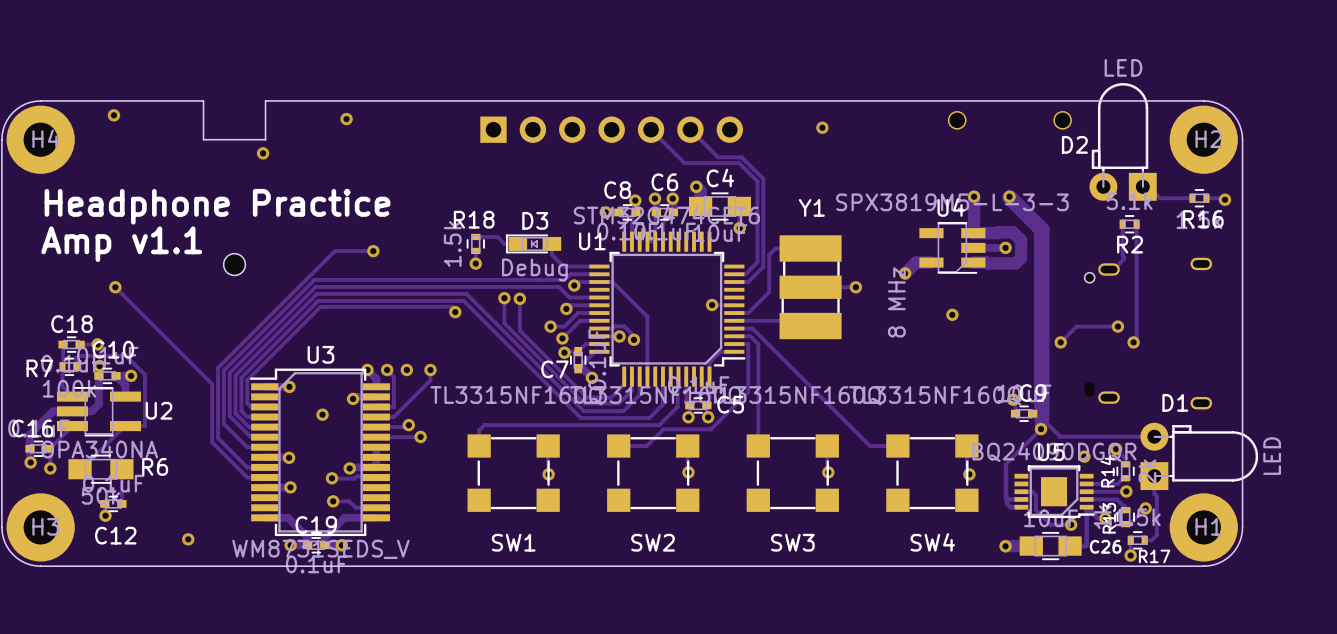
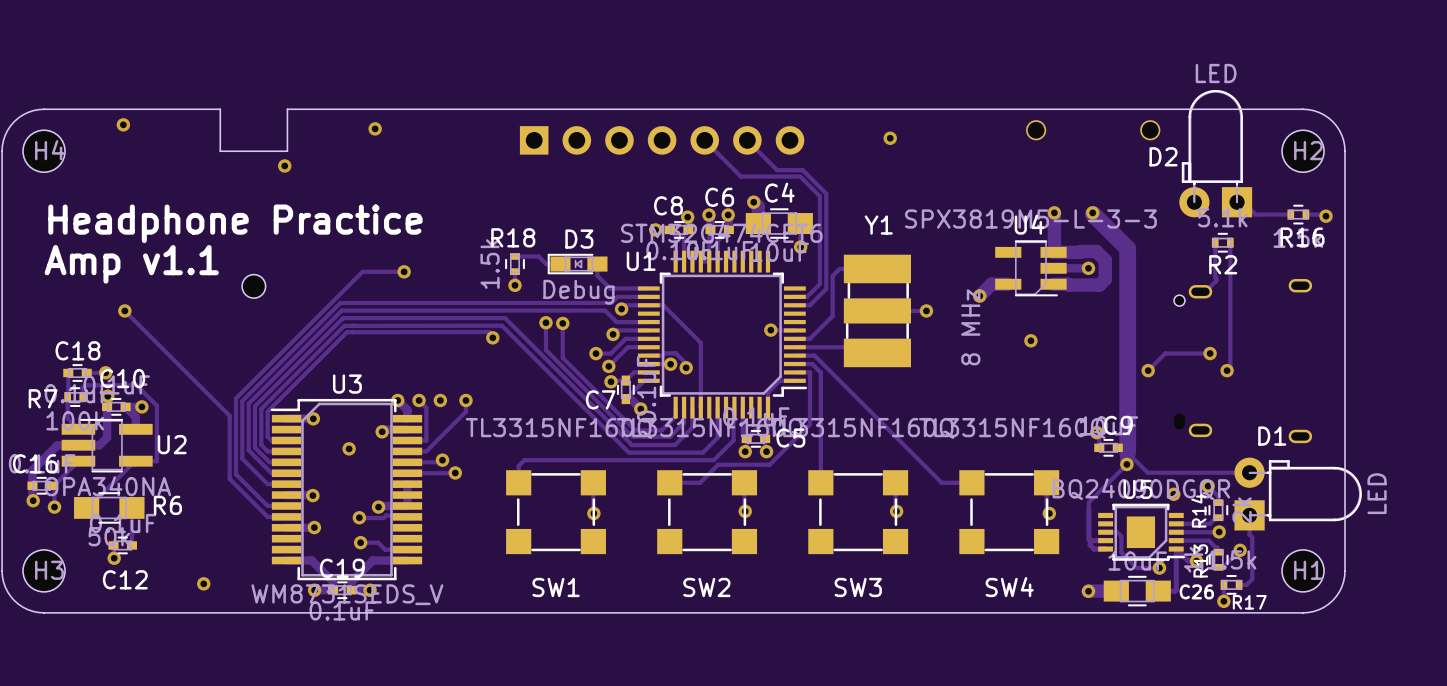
H4 footprint: [6, 105, 75, 174] -> [23, 130, 66, 173]
H2 footprint: [1169, 105, 1238, 174] -> [1282, 130, 1325, 173]
H3 footprint: [6, 493, 75, 562] -> [23, 549, 66, 592]
H1 footprint: [1169, 493, 1238, 562] -> [1282, 549, 1325, 592]

